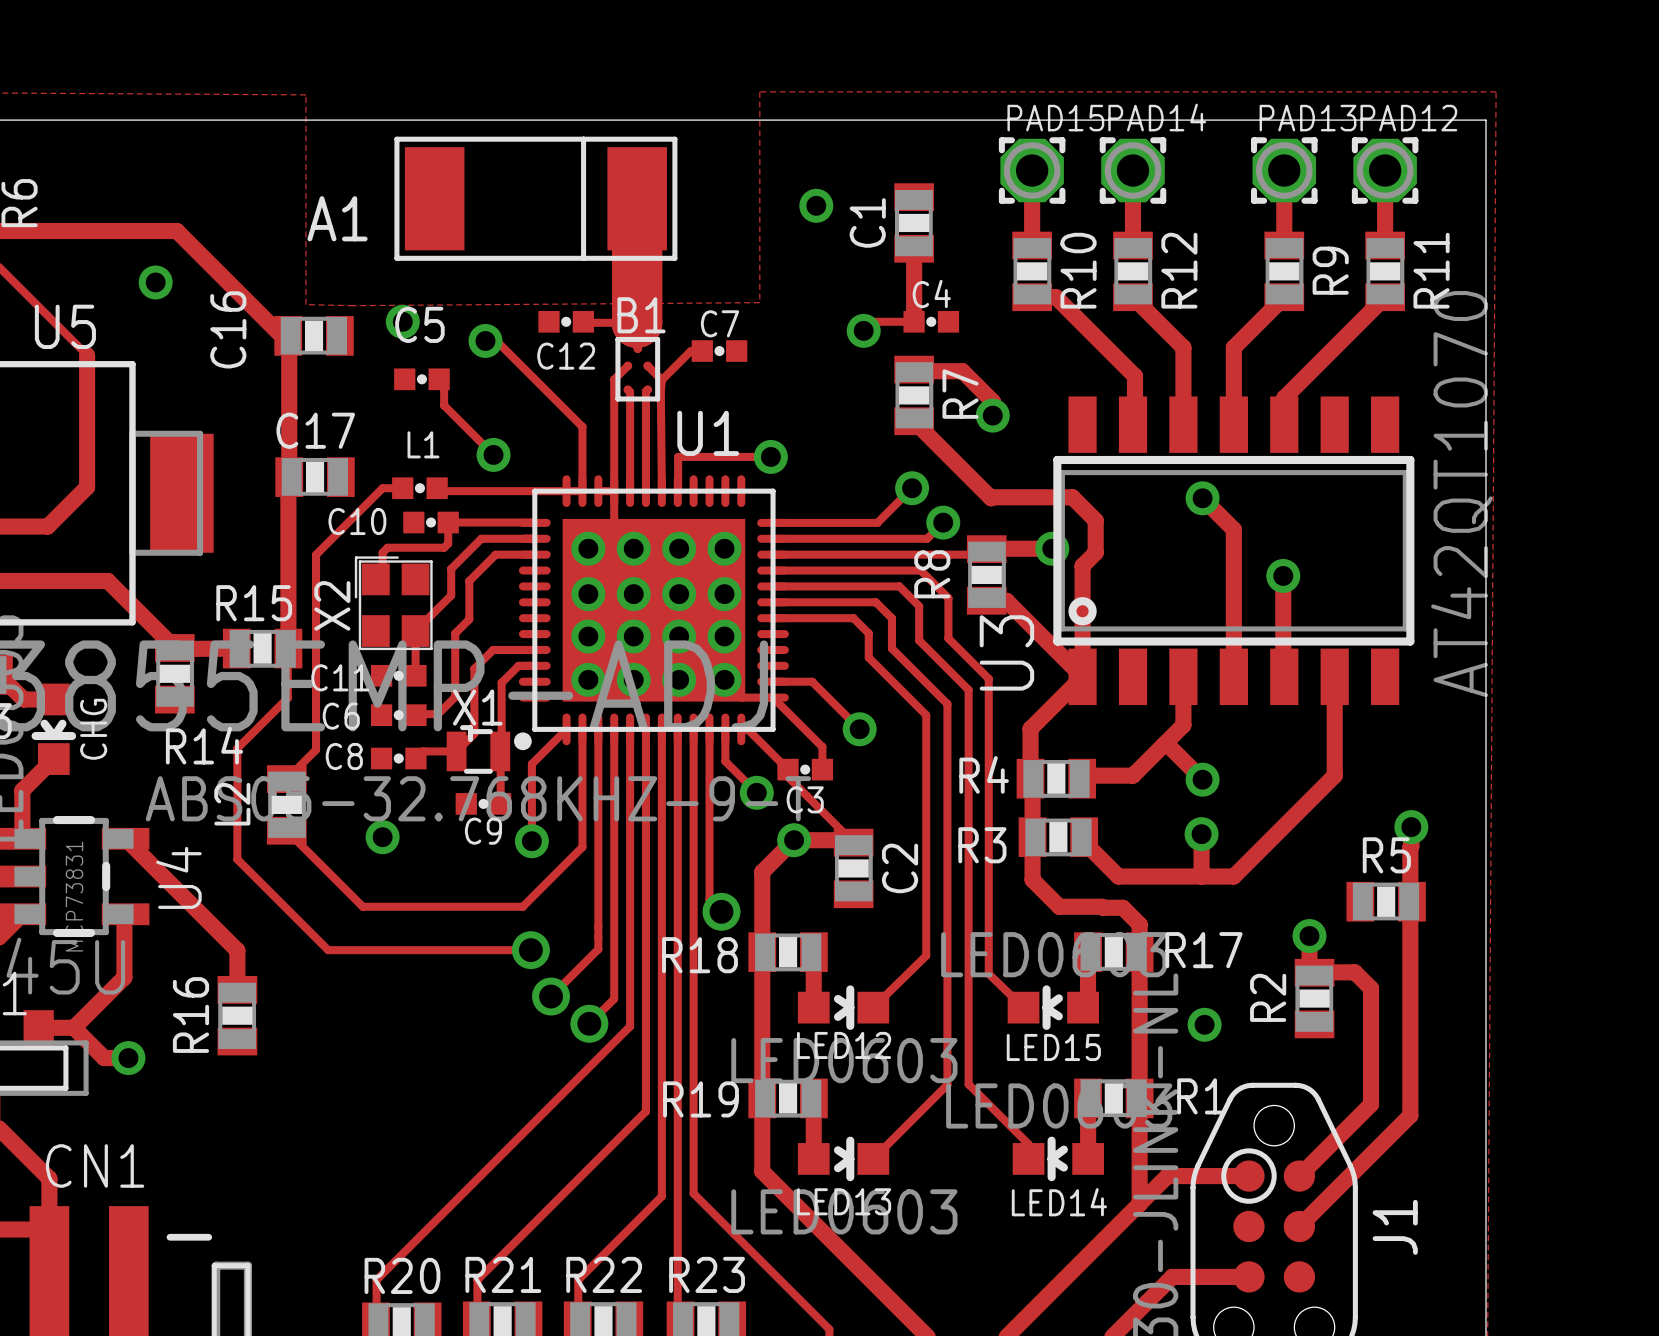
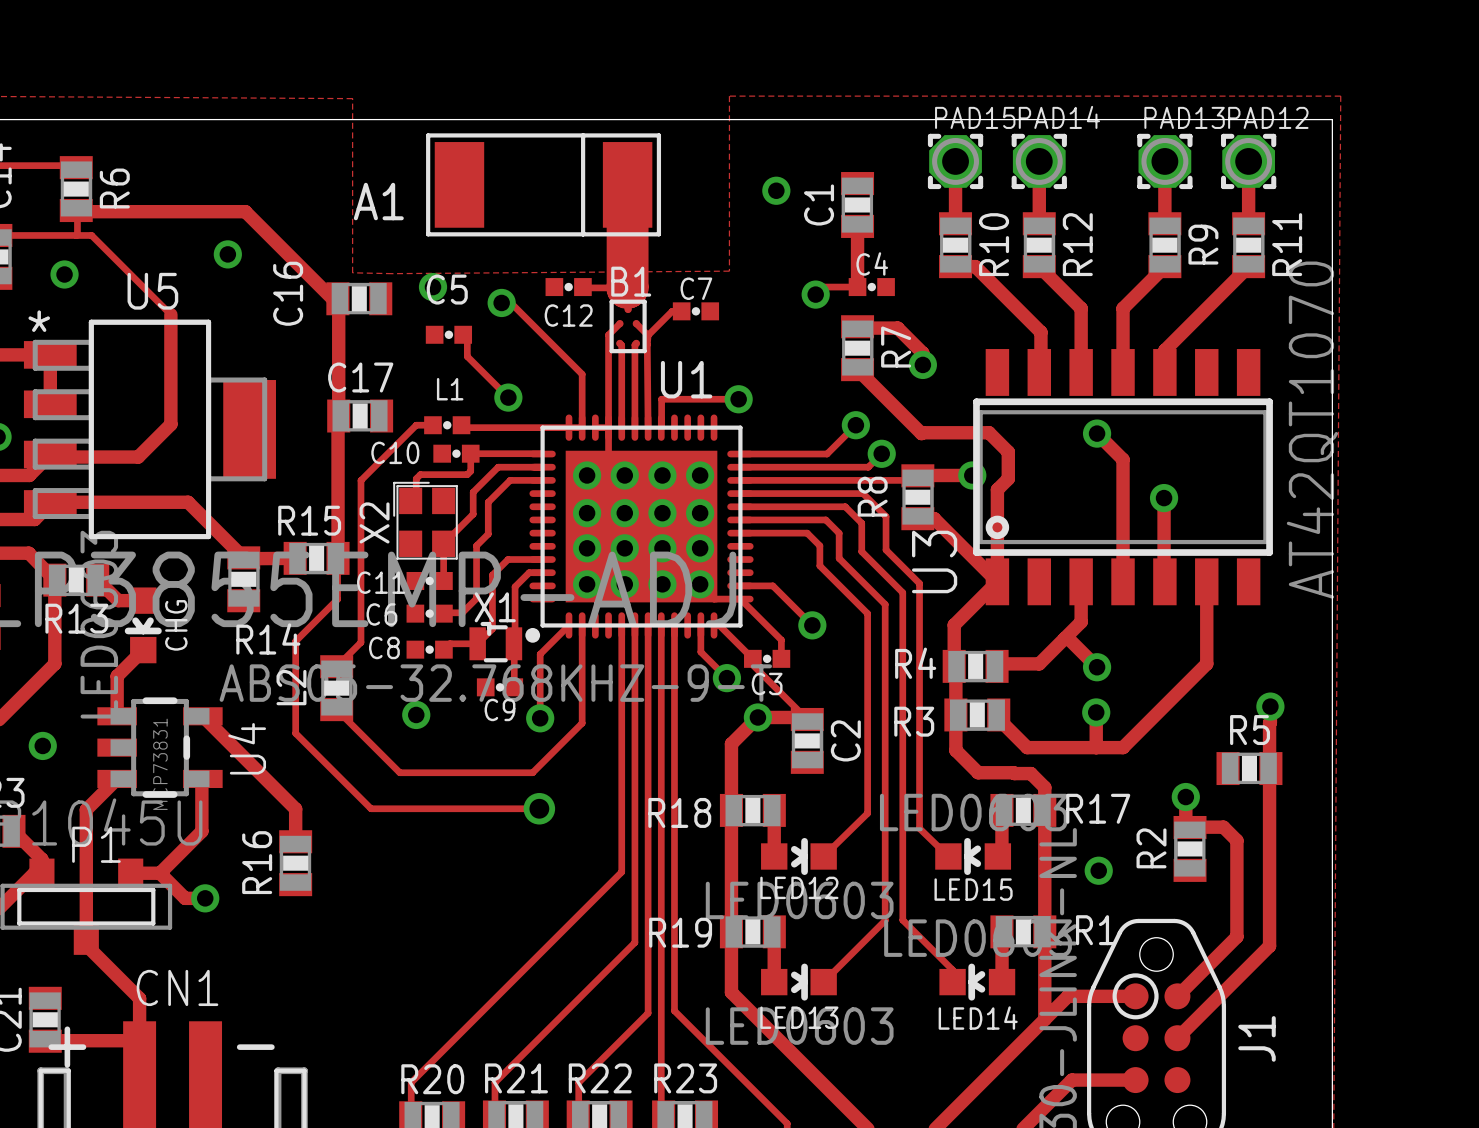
track: (598, 729) (598, 949) (551, 996) -> none
track: (614, 729) (614, 998) (589, 1023) -> none
track: (709, 729) (709, 899) (721, 911) -> none
via: (721, 911) -> none
via: (551, 996) -> none
via: (589, 1023) -> none

